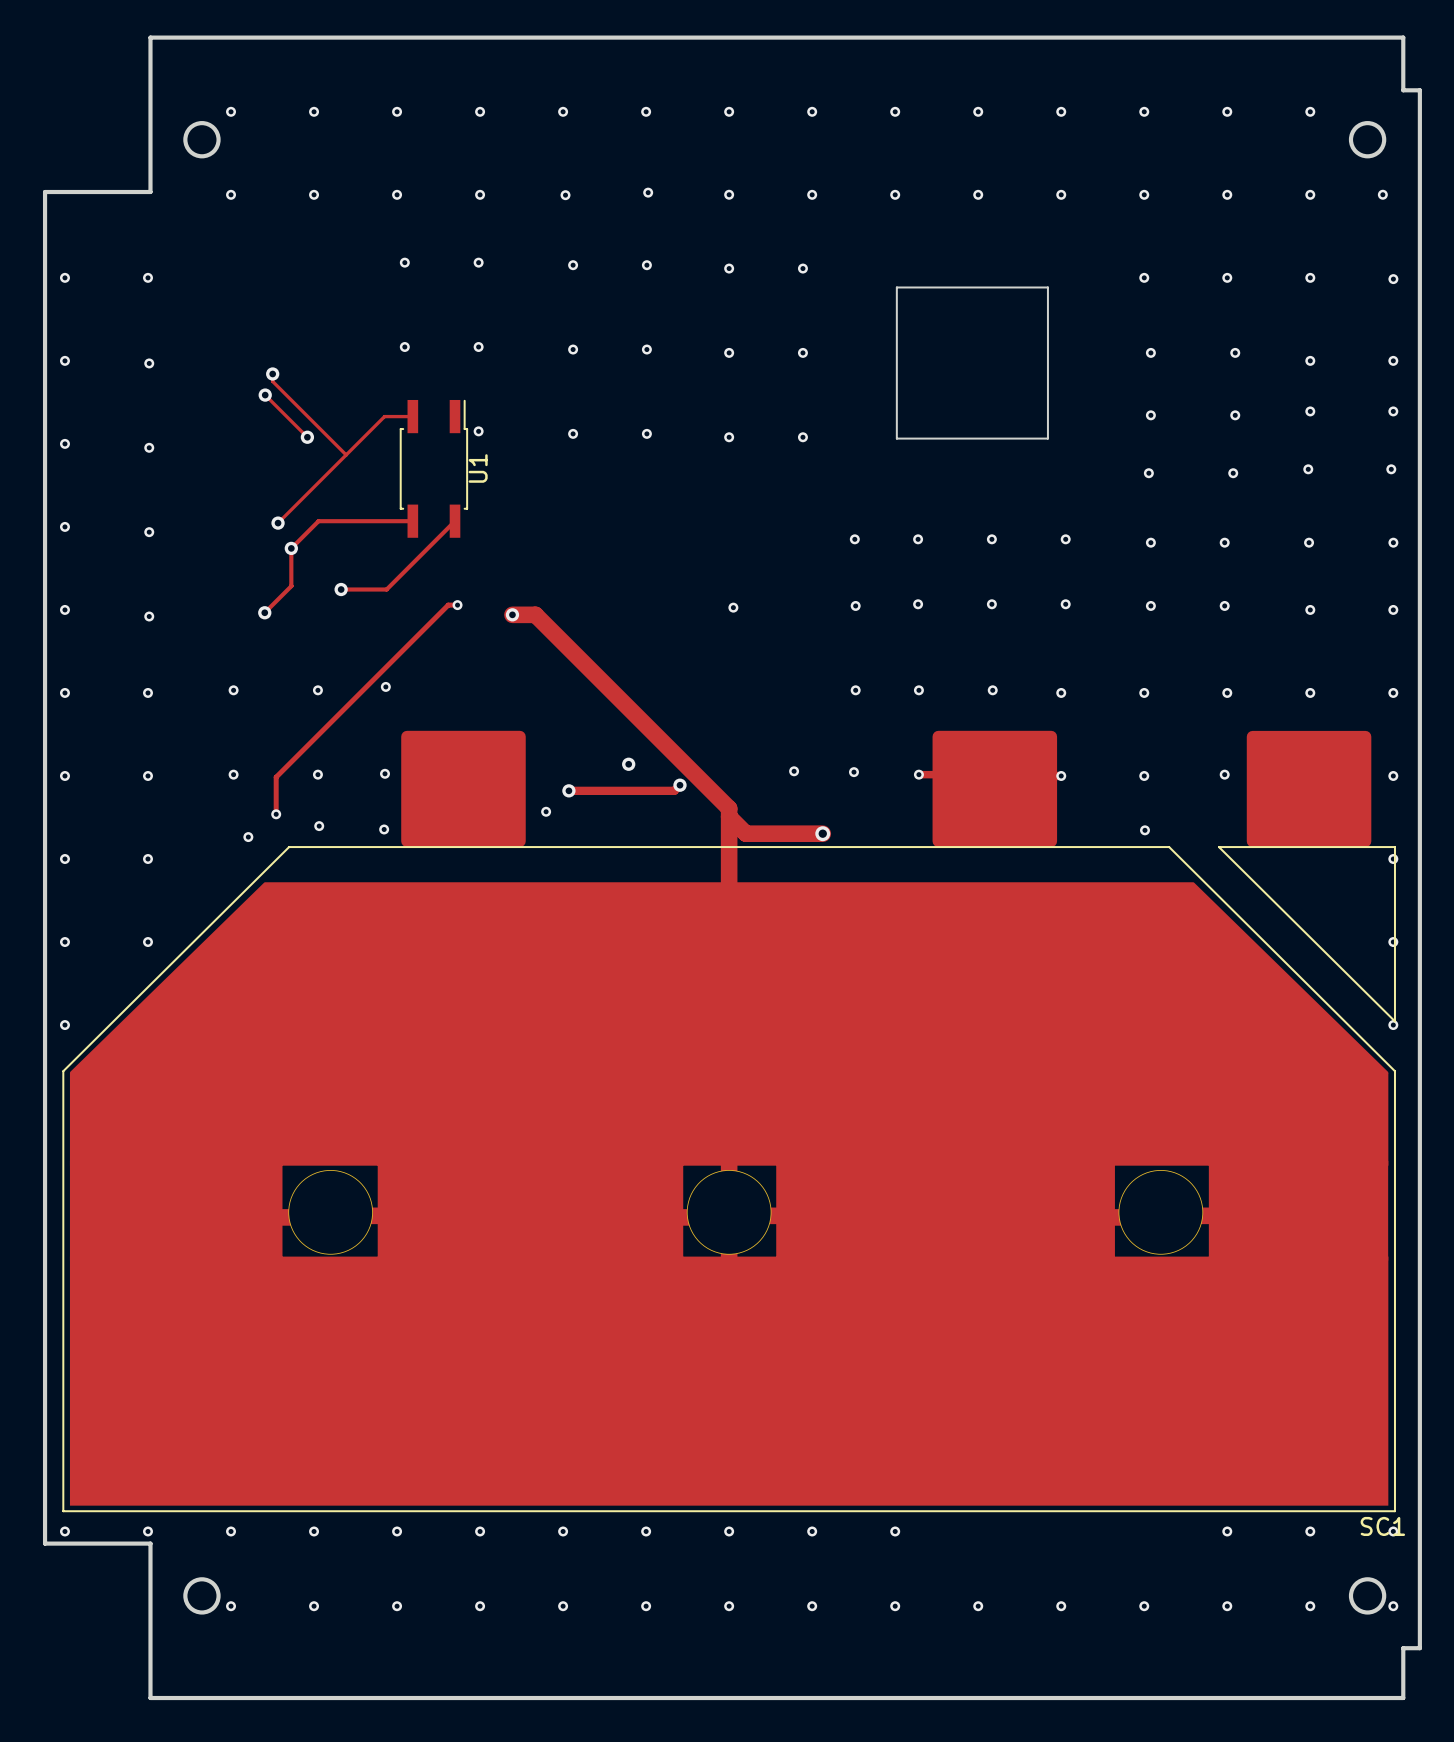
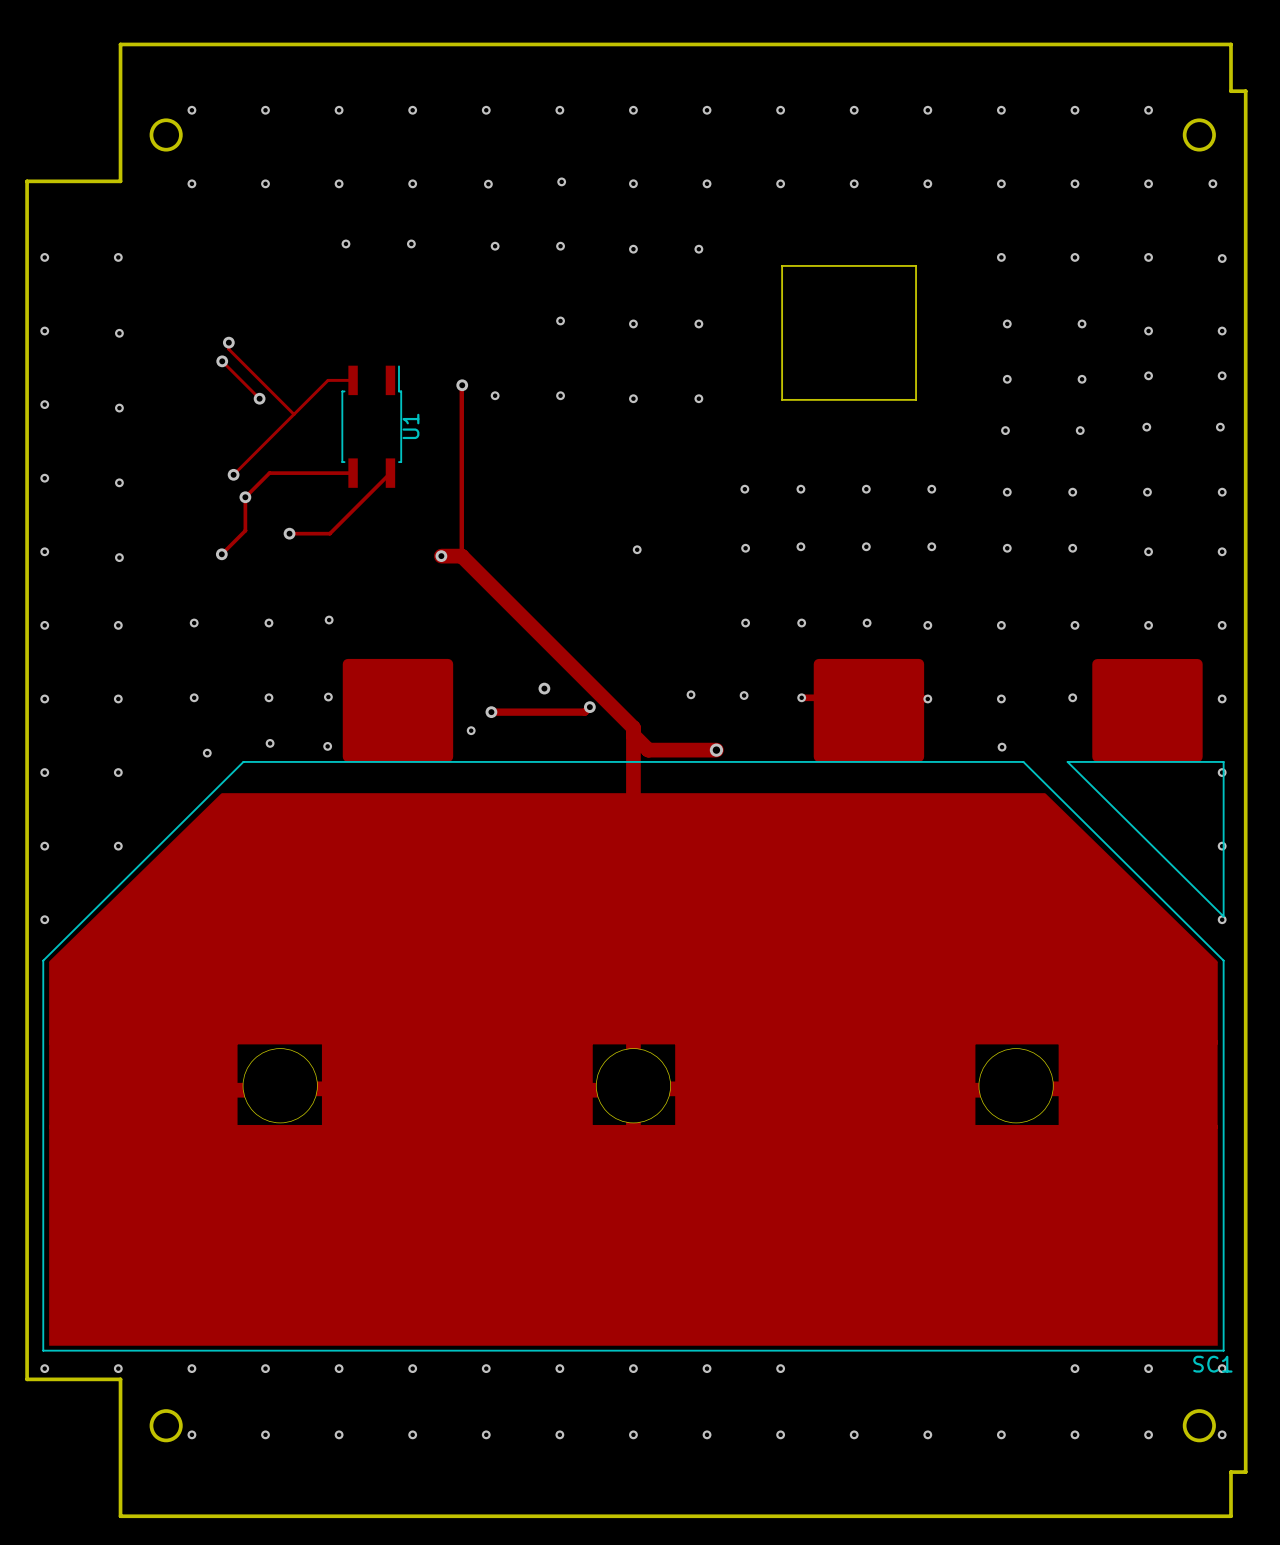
via: (404, 347) -> none
via: (478, 347) -> none
via: (573, 349) -> none
track: none -> (462, 385) (461, 556)
via: none -> (462, 385)
via: (478, 431) -> none
track: (457, 605) (448, 605) (276, 777) (276, 814) -> none
via: (457, 605) -> none
via: (276, 814) -> none

